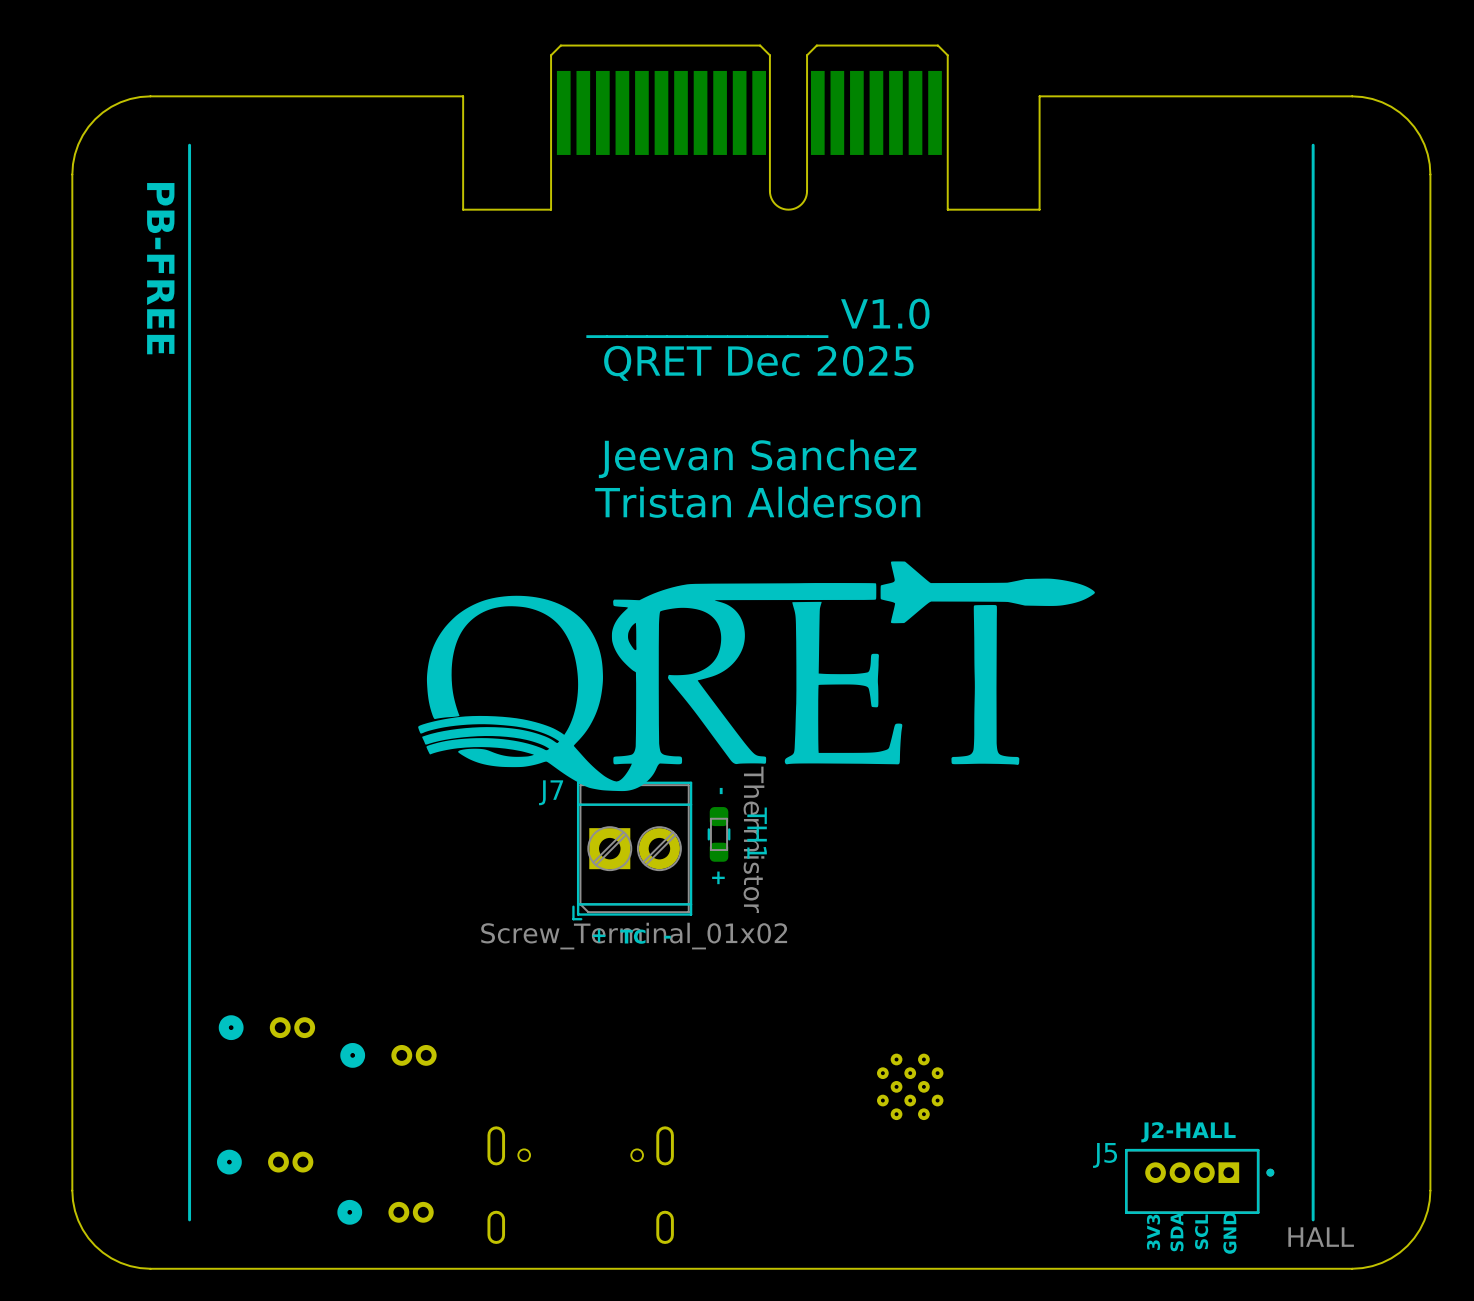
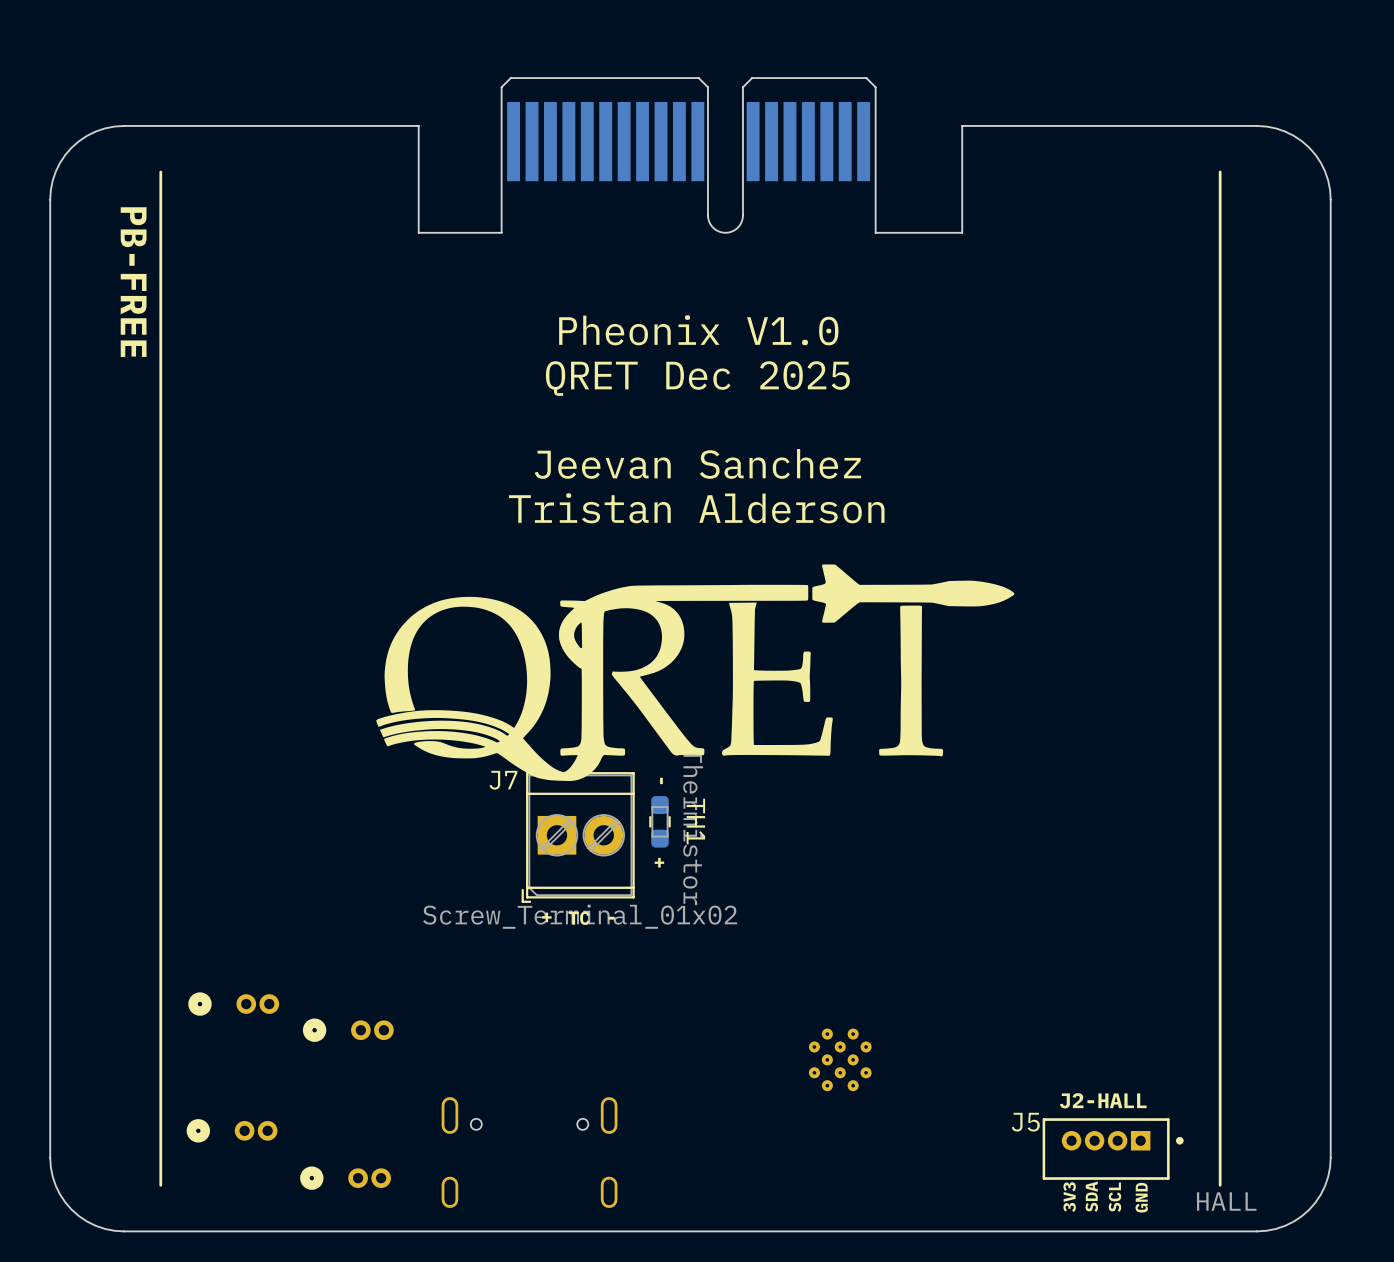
text: ____________ V1.0 (757, 318) -> Pheonix V1.0 (698, 330)

